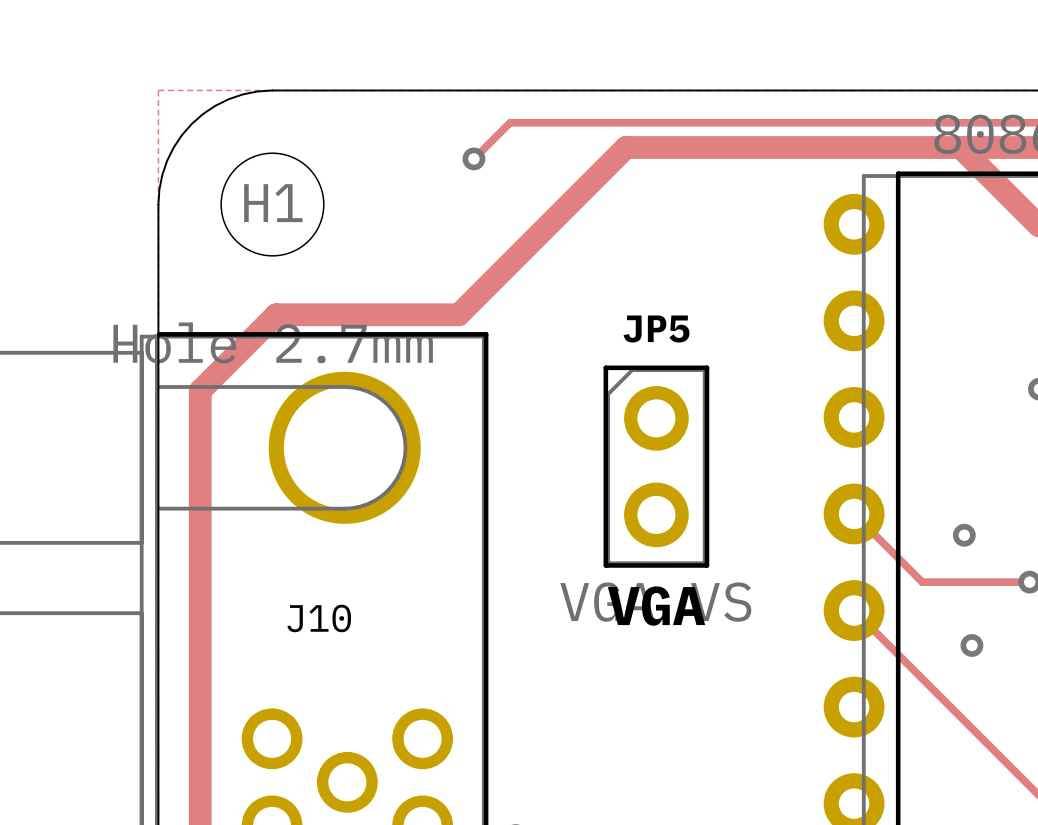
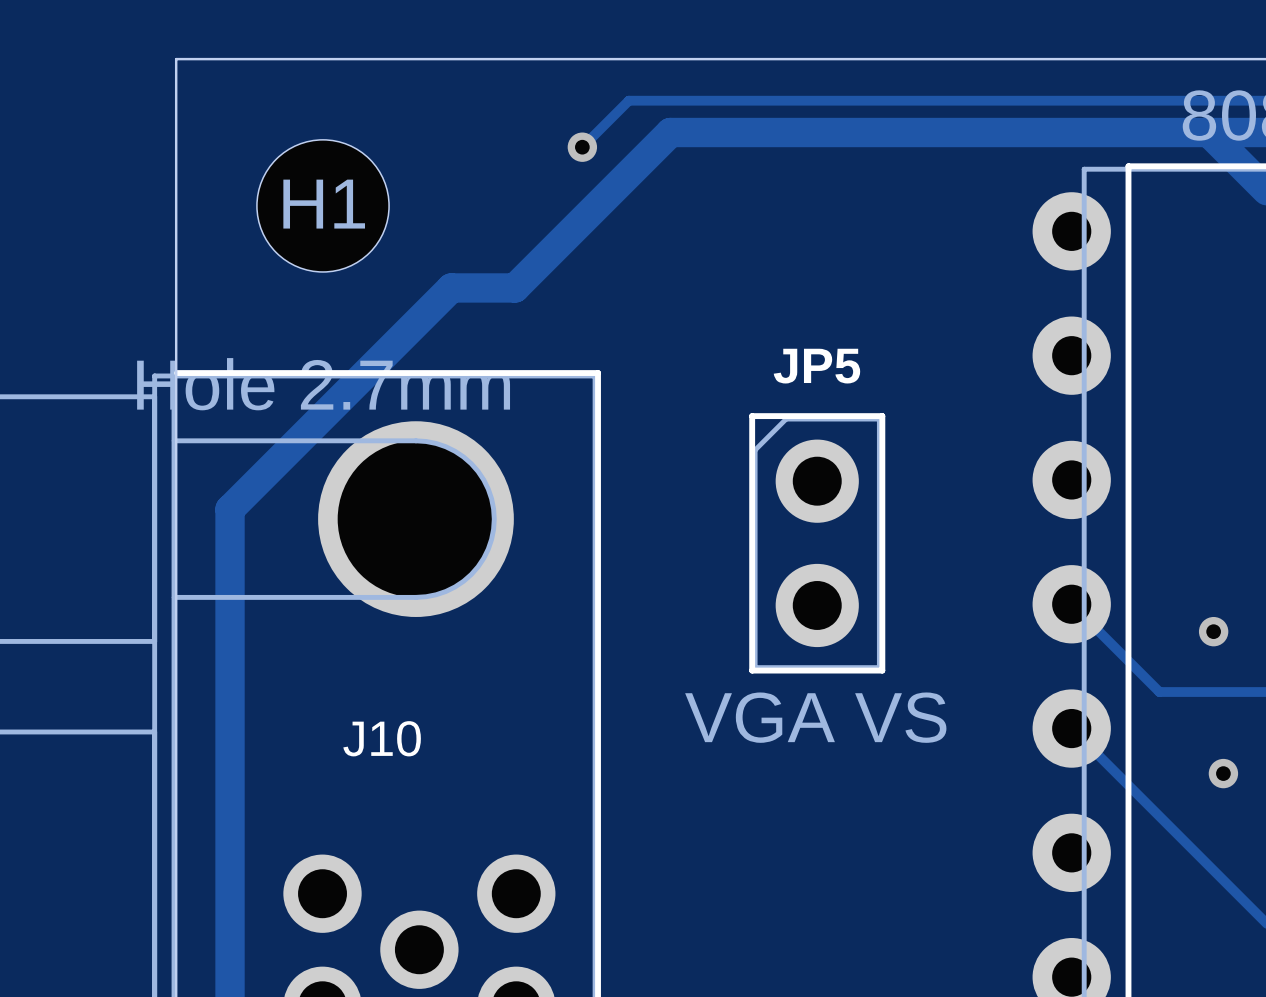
board edge: (272, 90) (242, 94) (228, 99) (203, 114) (191, 123) (181, 135) (167, 160) (162, 175) (158, 204) -> (323, 59) (176, 59) (176, 205)
track: (626, 147) (458, 314) (276, 314) (200, 390) (200, 440) -> (778, 132) (670, 132) (515, 287) (451, 287) (230, 509)
text: VGA (656, 606) -> none

